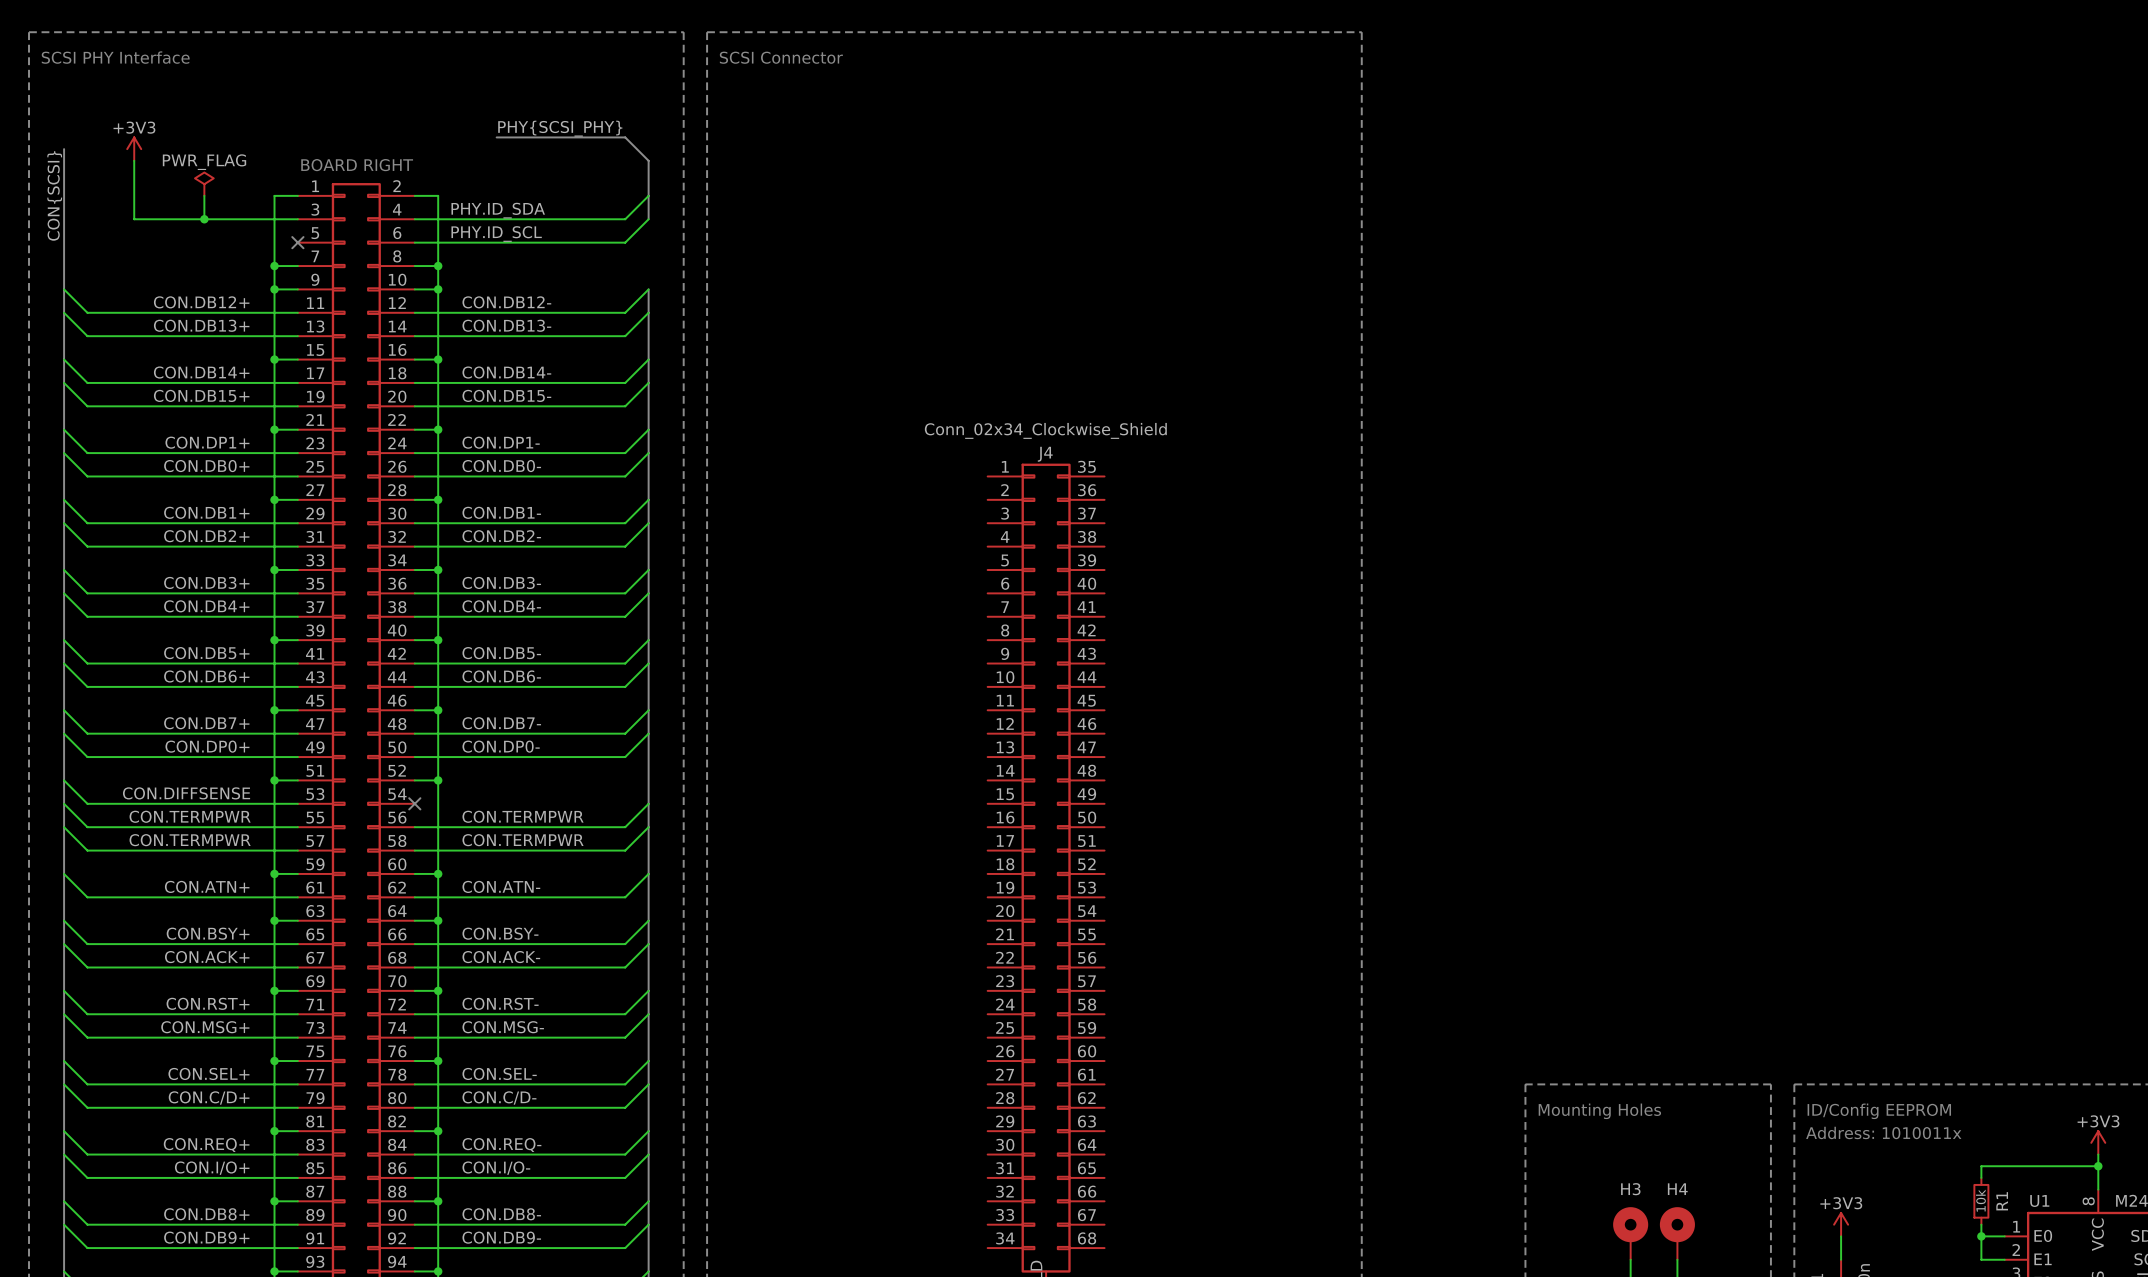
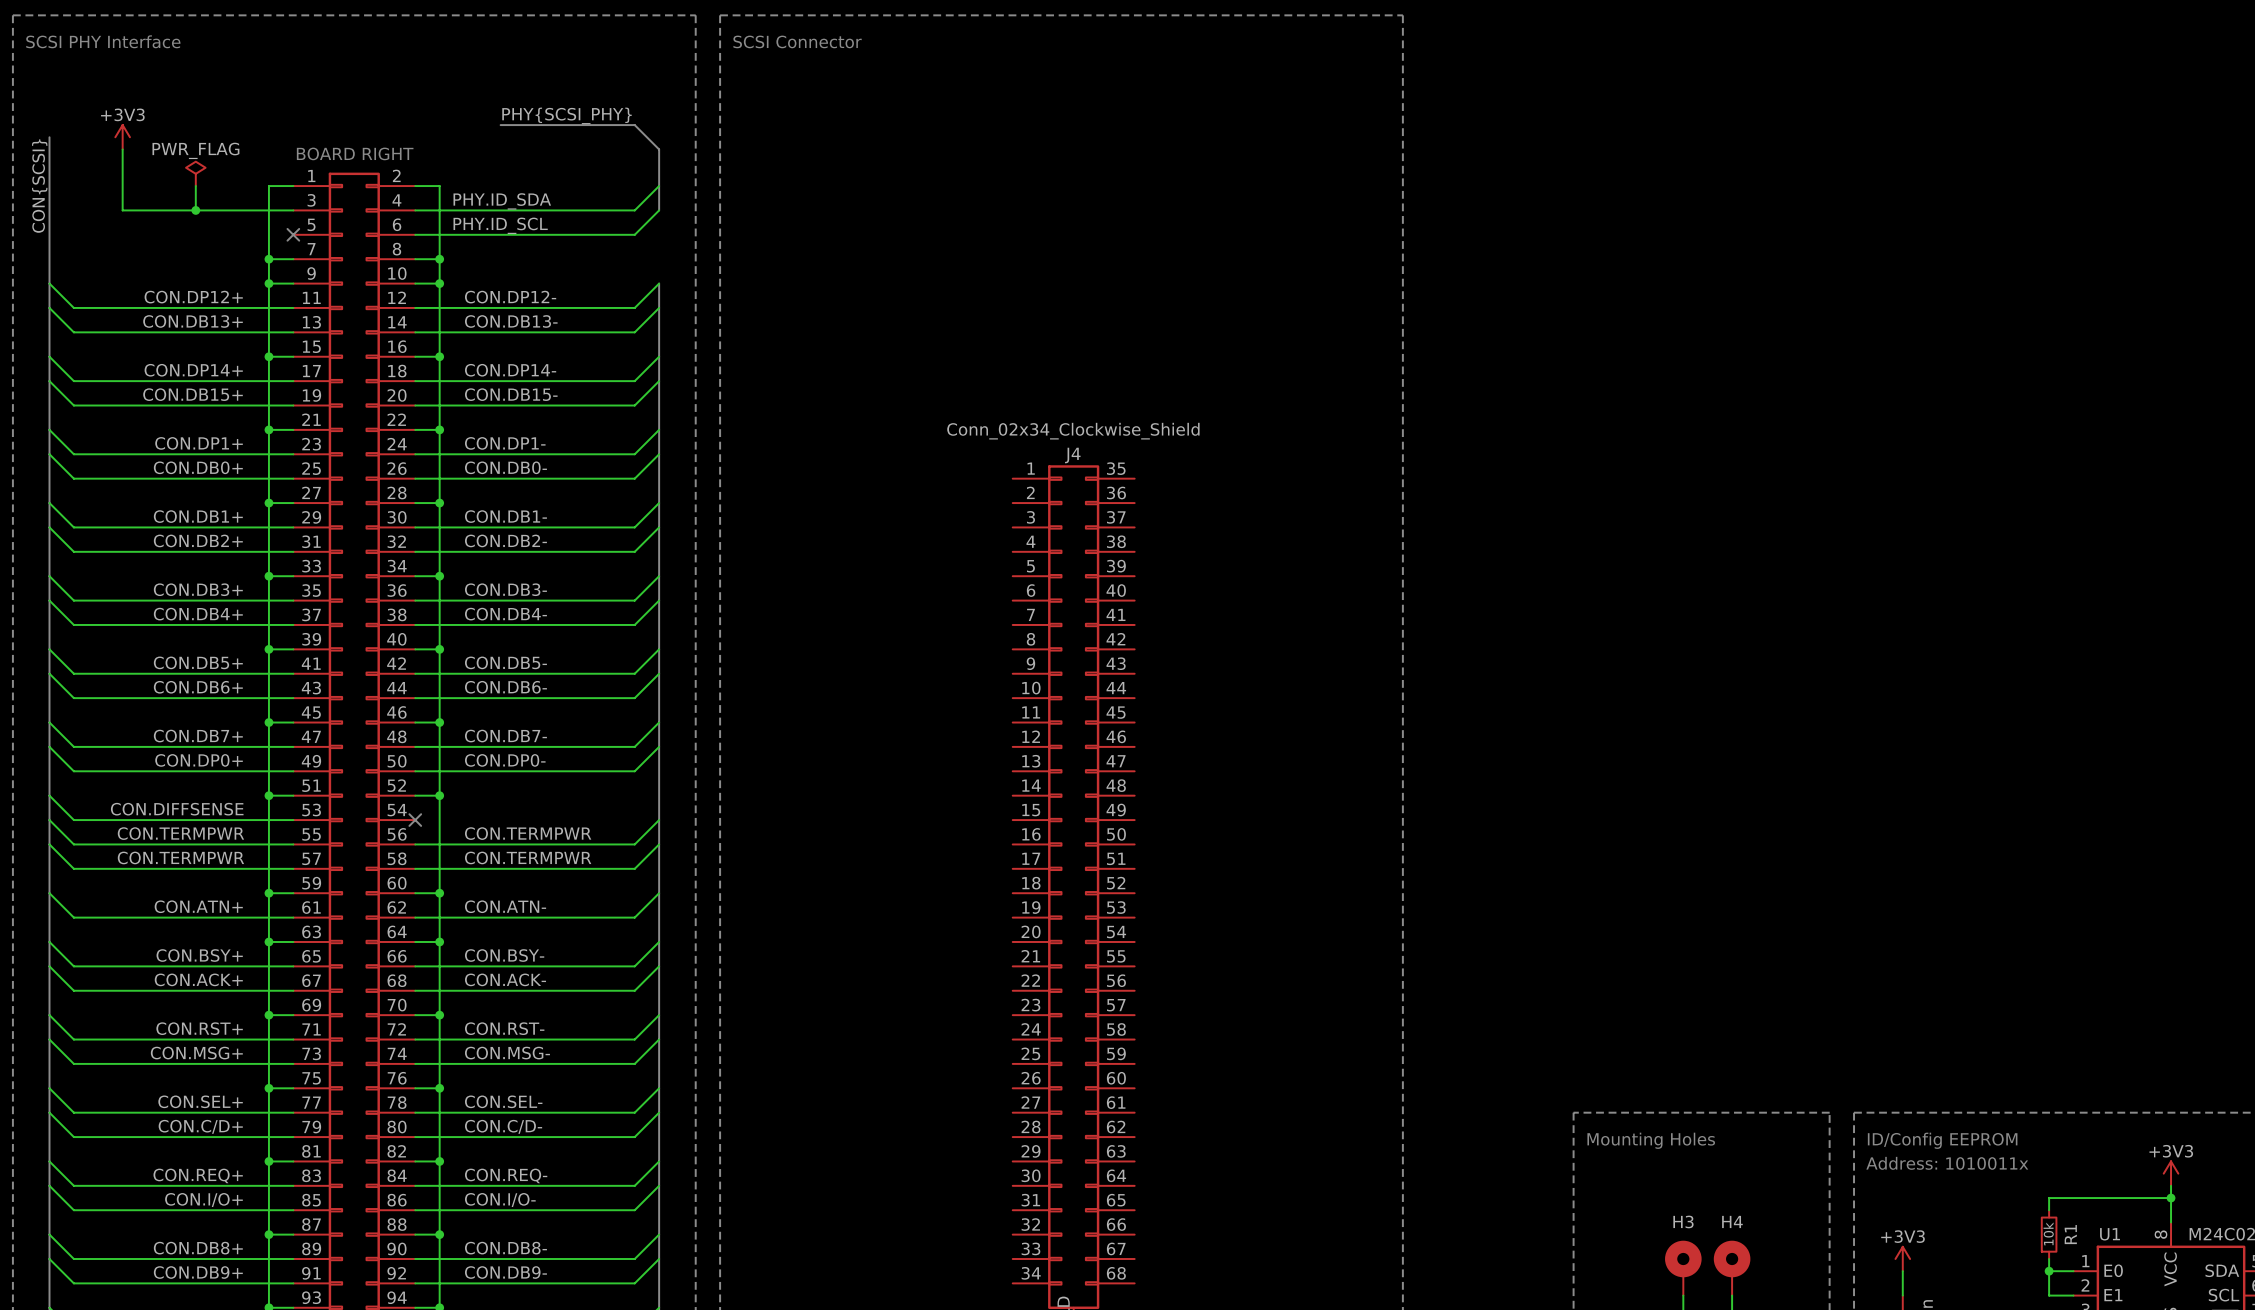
label: CON.DB12+ (201, 302) -> CON.DP12+ (193, 297)
label: CON.DB12- (506, 302) -> CON.DP12- (510, 297)
label: CON.DB14+ (201, 372) -> CON.DP14+ (193, 370)
label: CON.DB14- (506, 372) -> CON.DP14- (510, 370)

